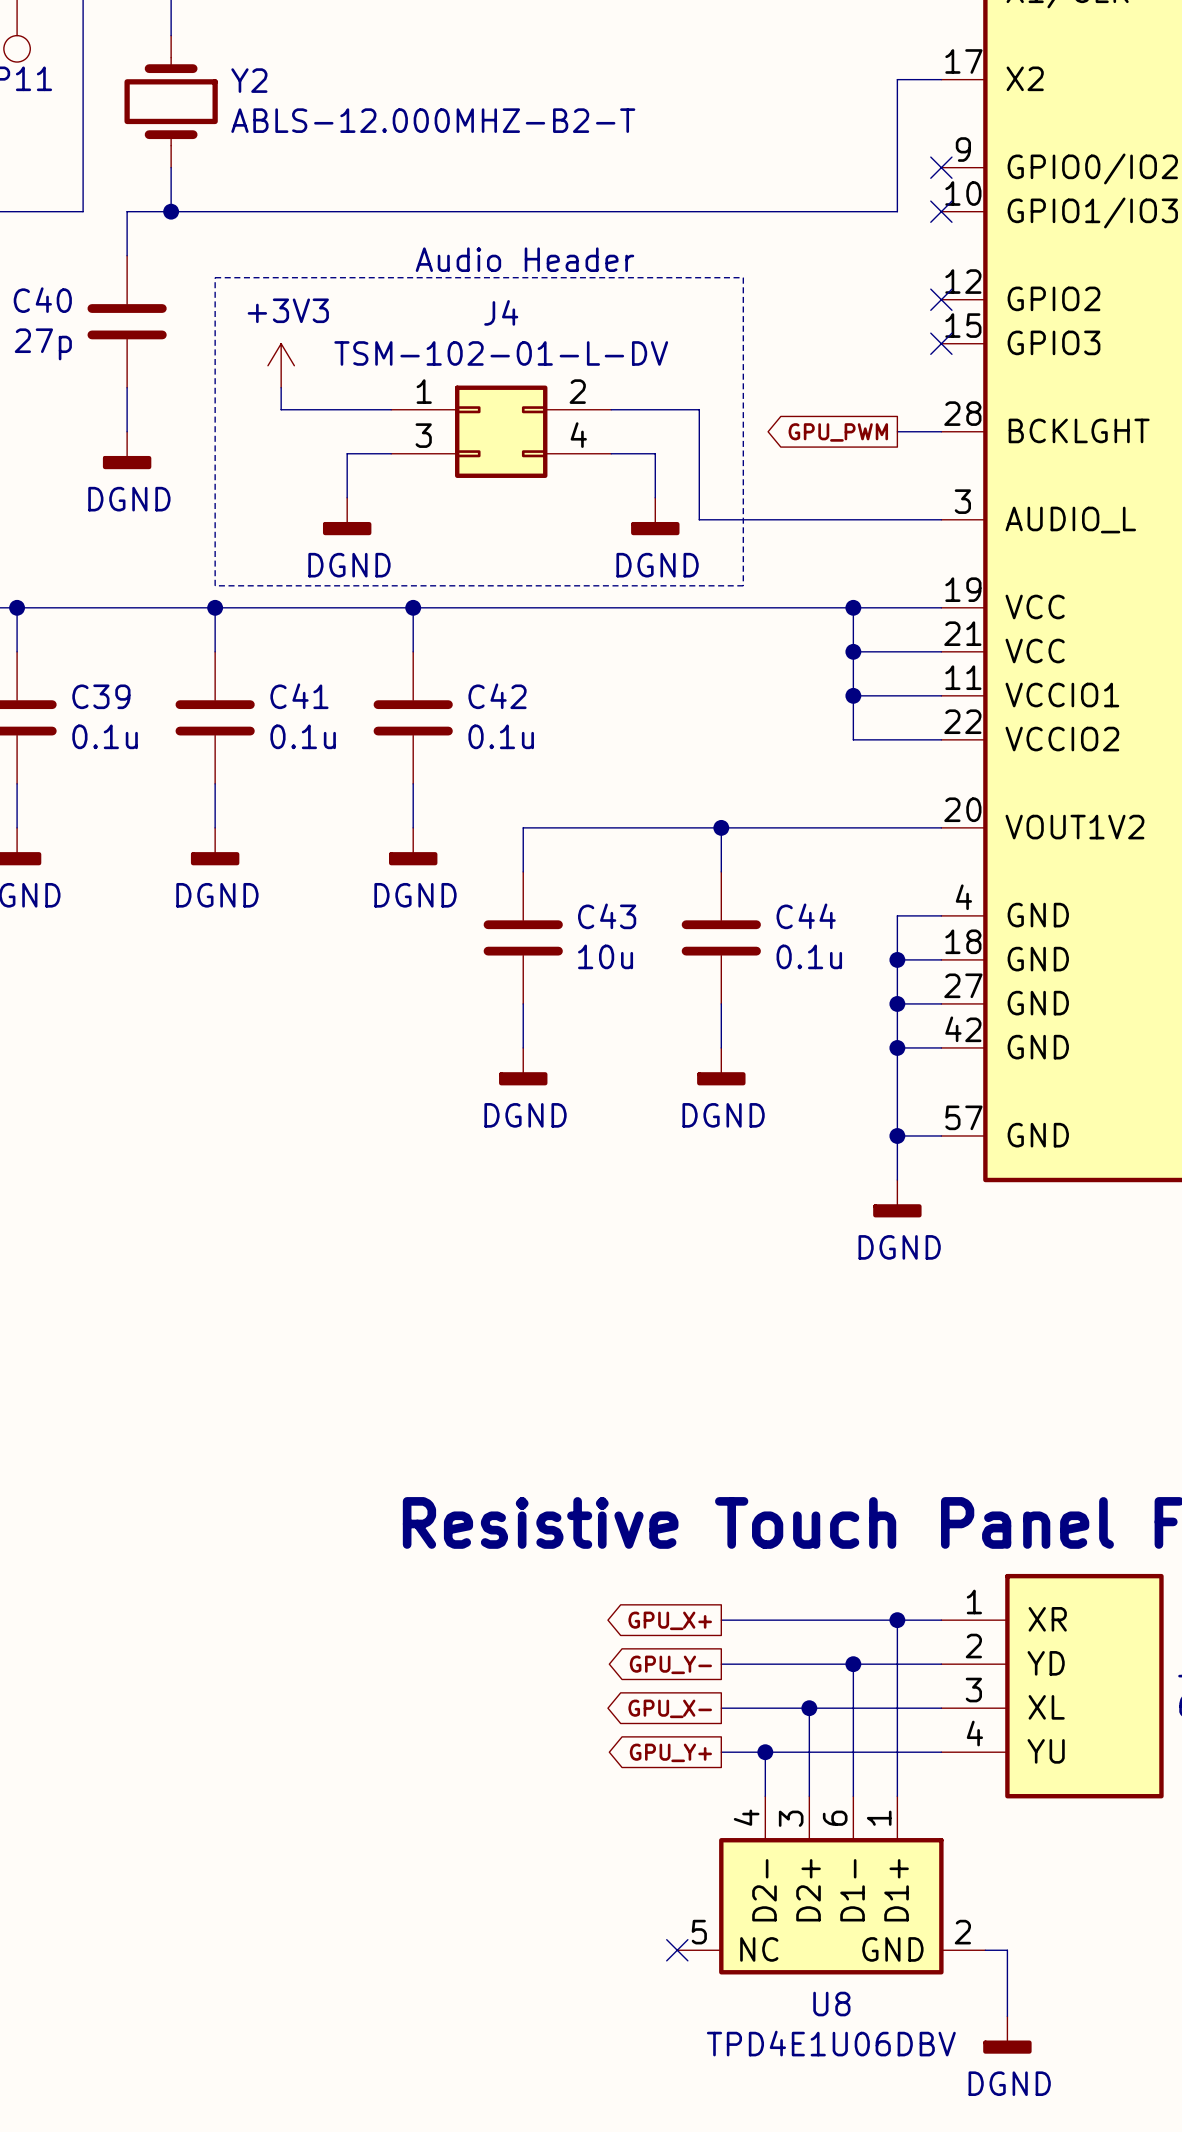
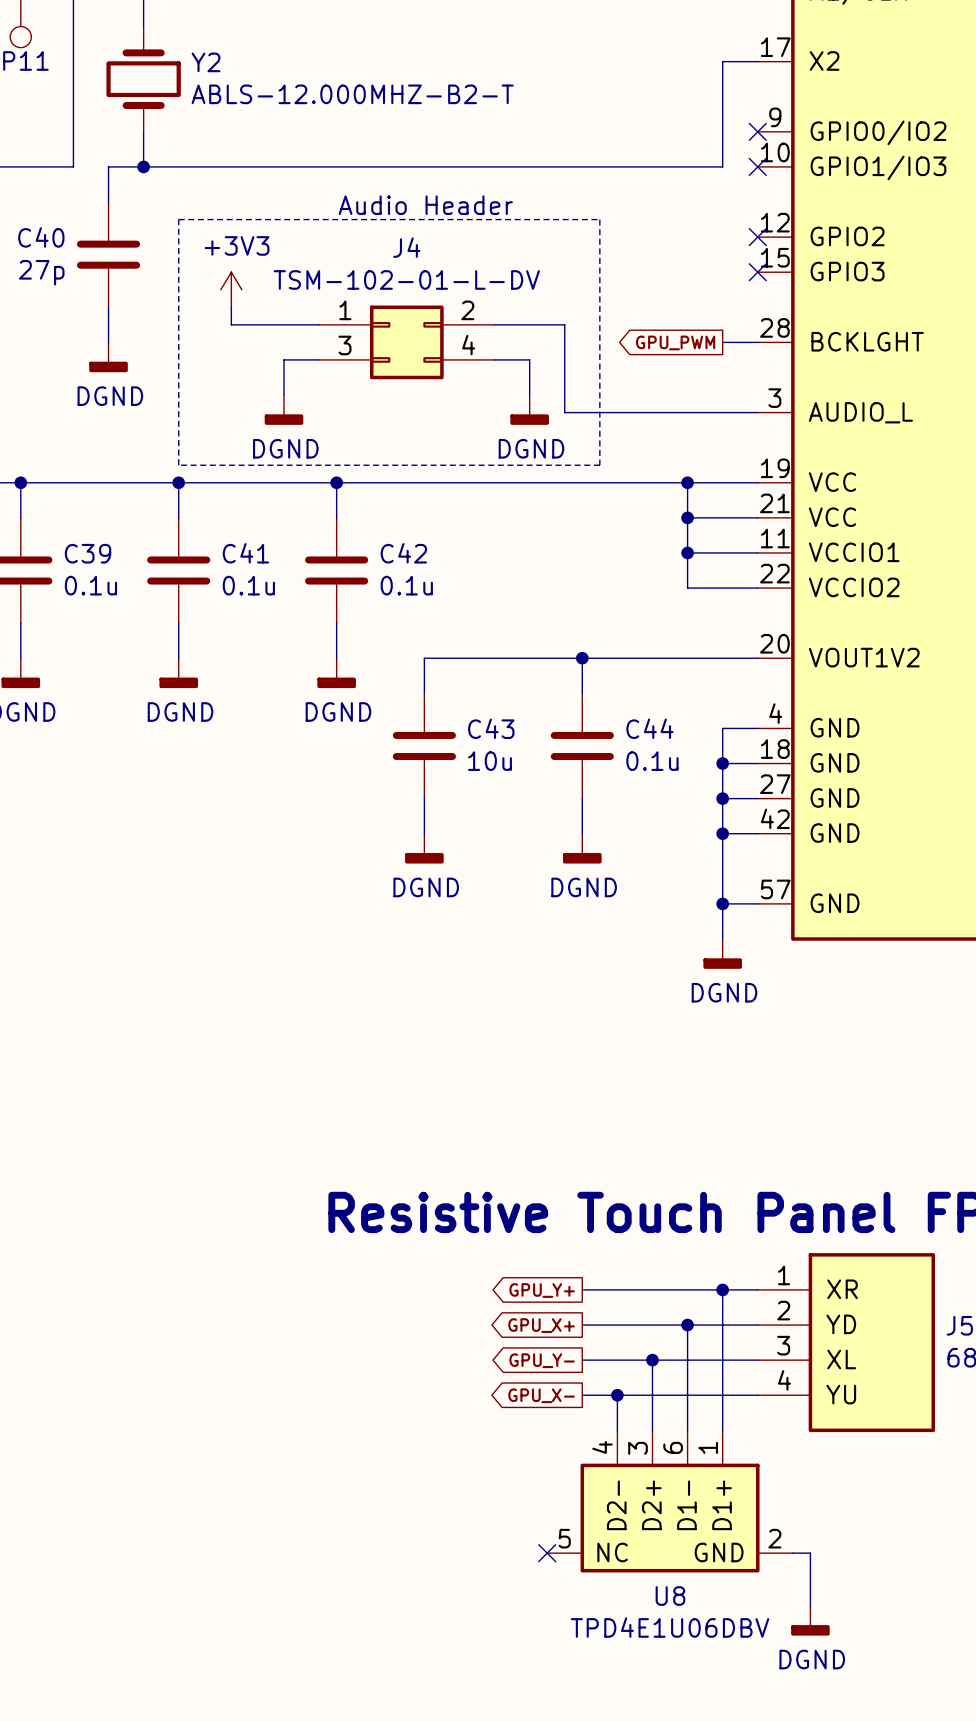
global label: GPU_X+ (670, 1620) -> GPU_Y+ (542, 1290)
global label: GPU_Y- (670, 1664) -> GPU_X+ (541, 1325)
global label: GPU_X- (670, 1708) -> GPU_Y- (542, 1360)
global label: GPU_Y+ (670, 1752) -> GPU_X- (541, 1395)

